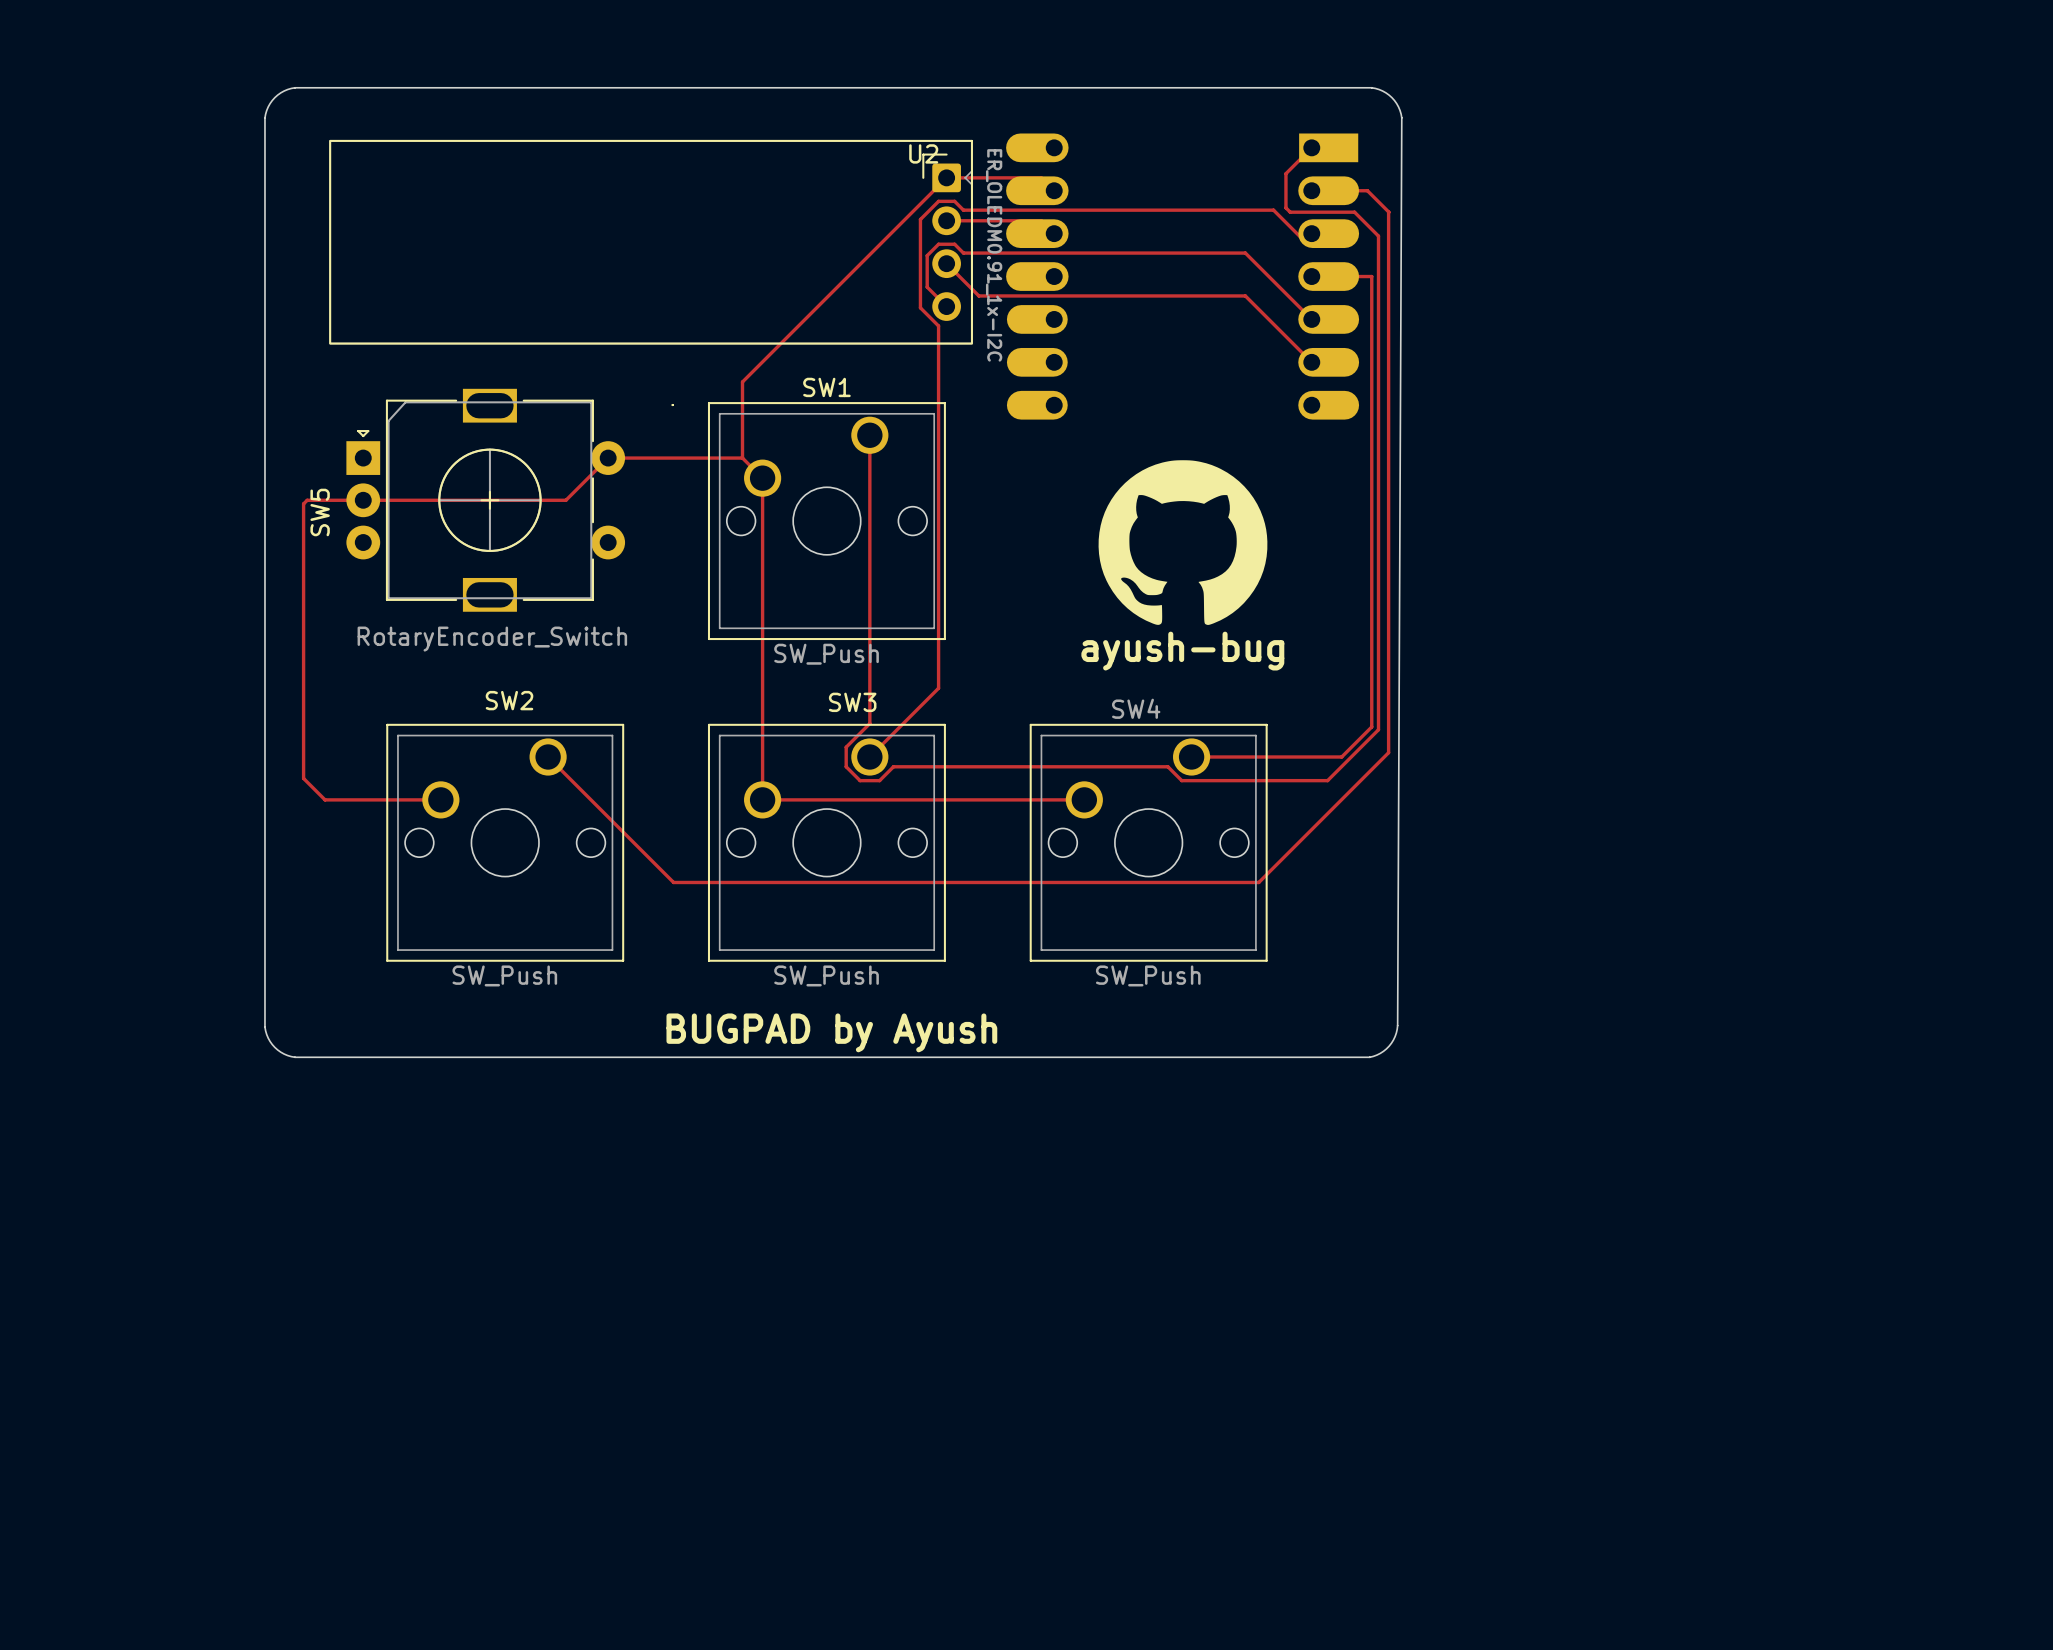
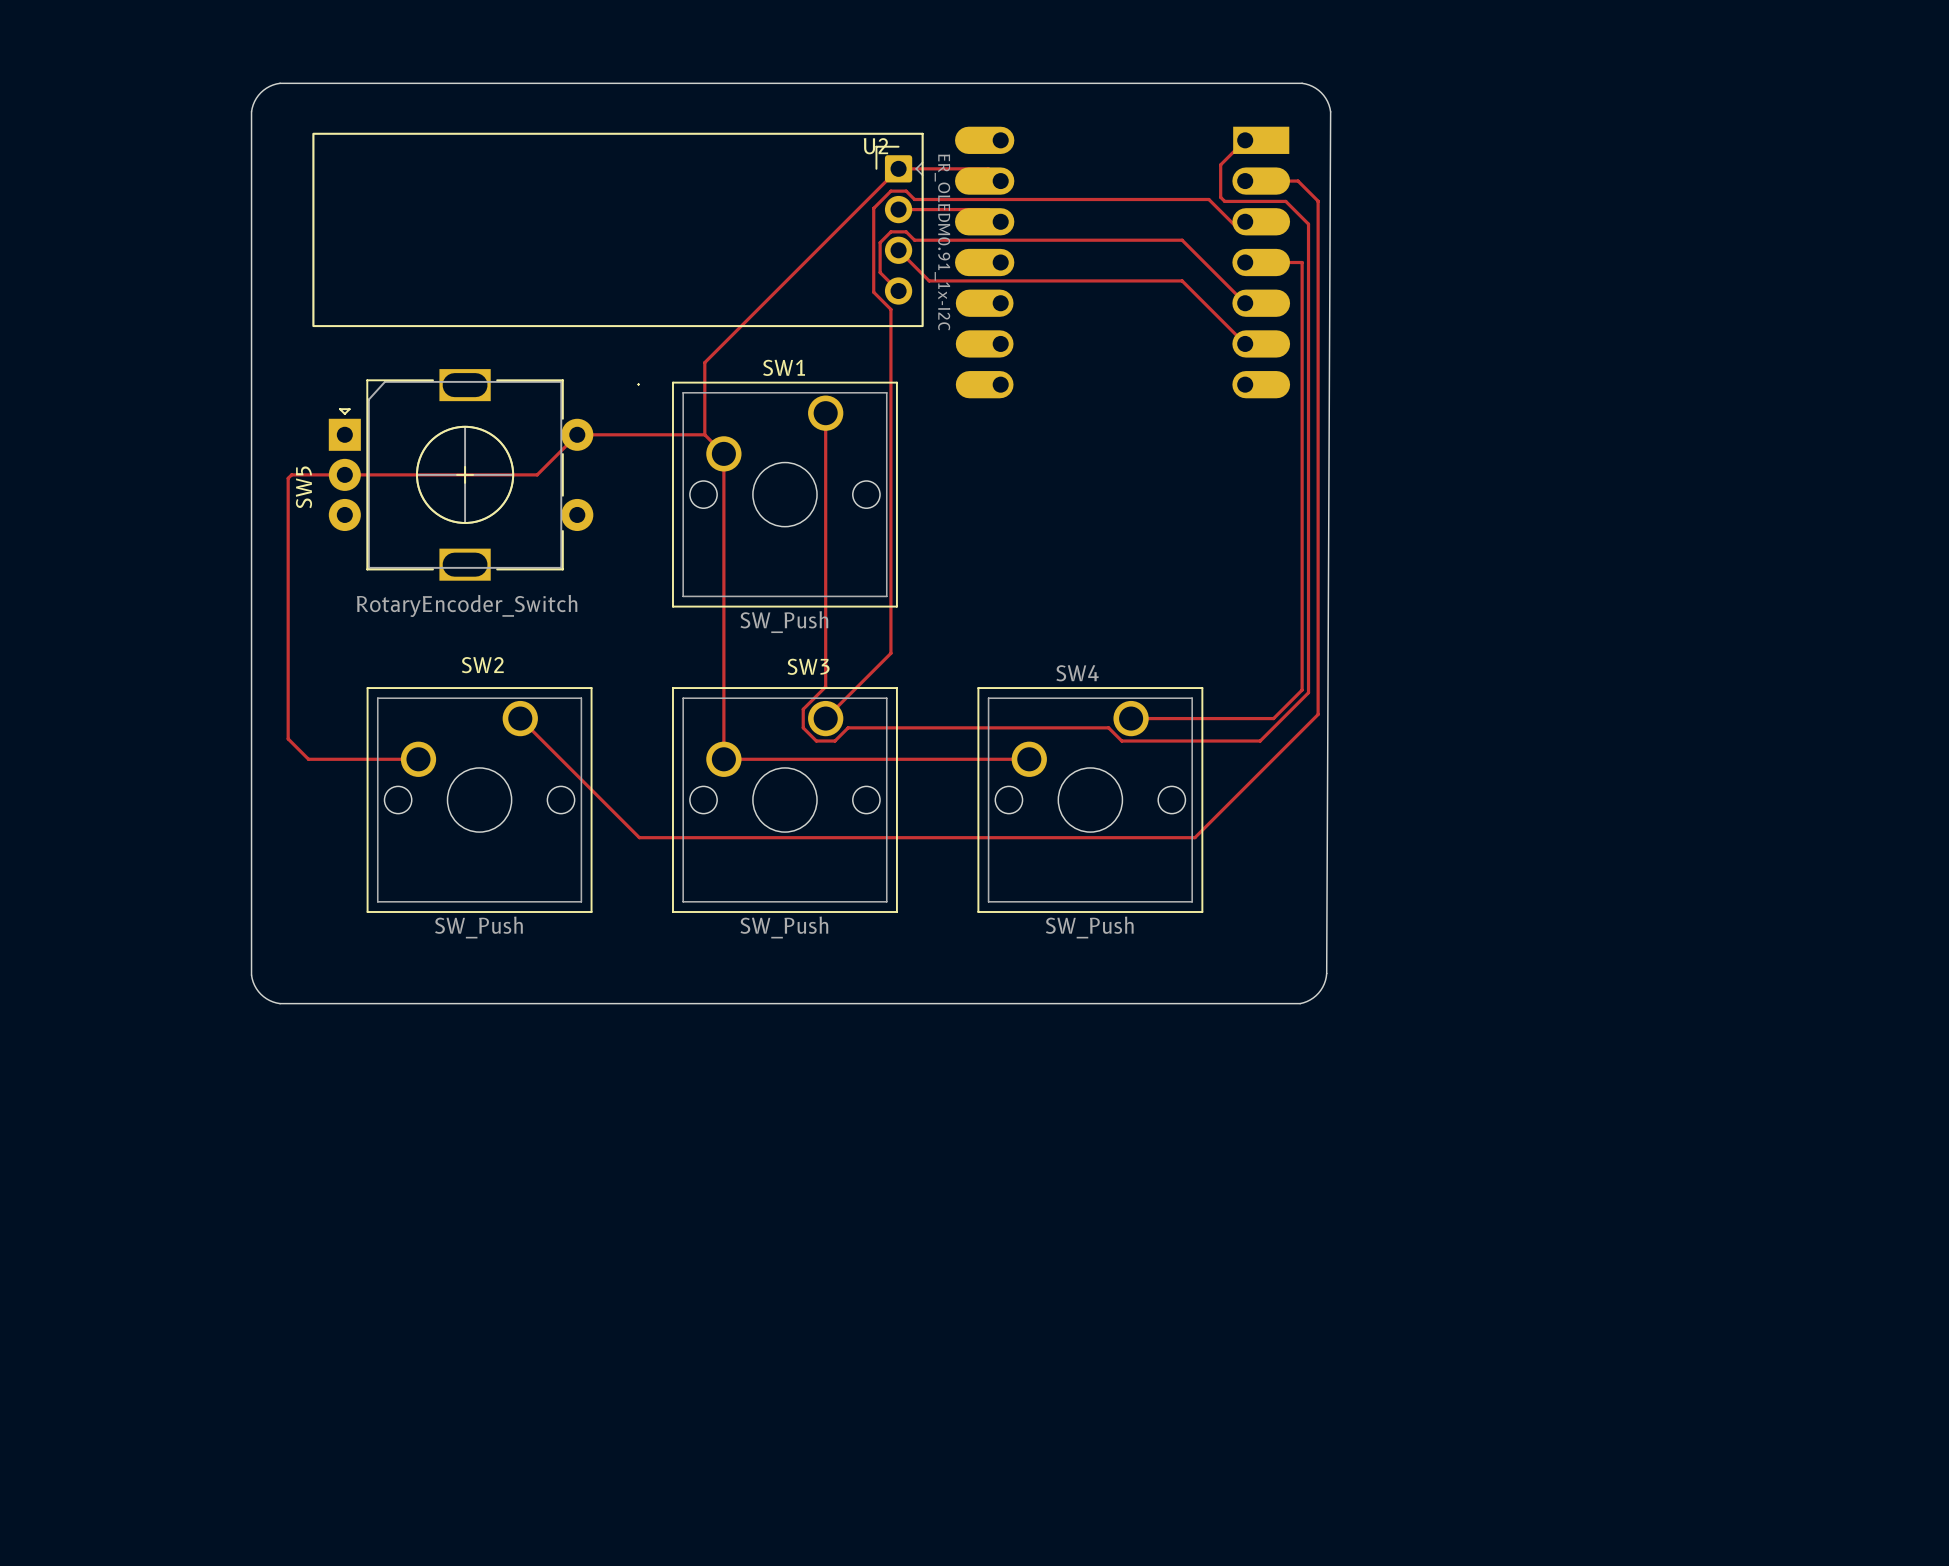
drawing: [1098, 460, 1268, 625] -> none
text: ayush-bug (1182, 651) -> none
text: BUGPAD by Ayush (831, 1032) -> none

